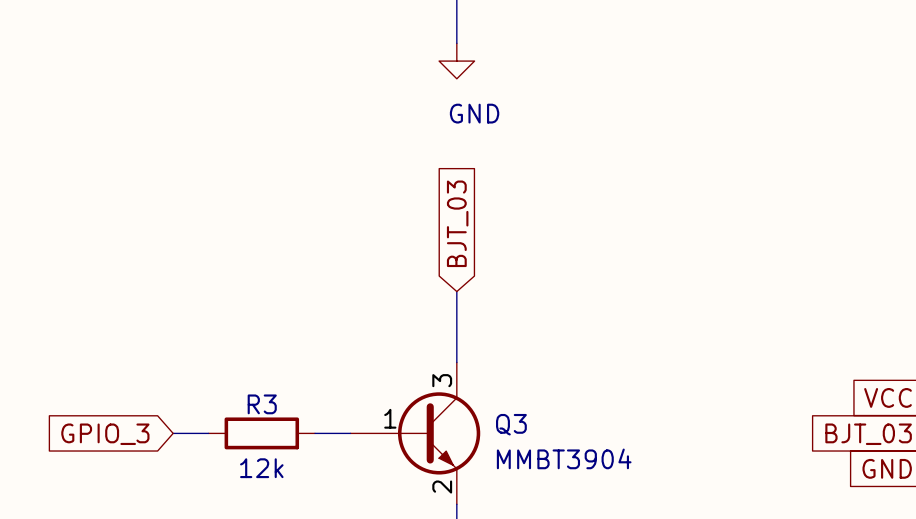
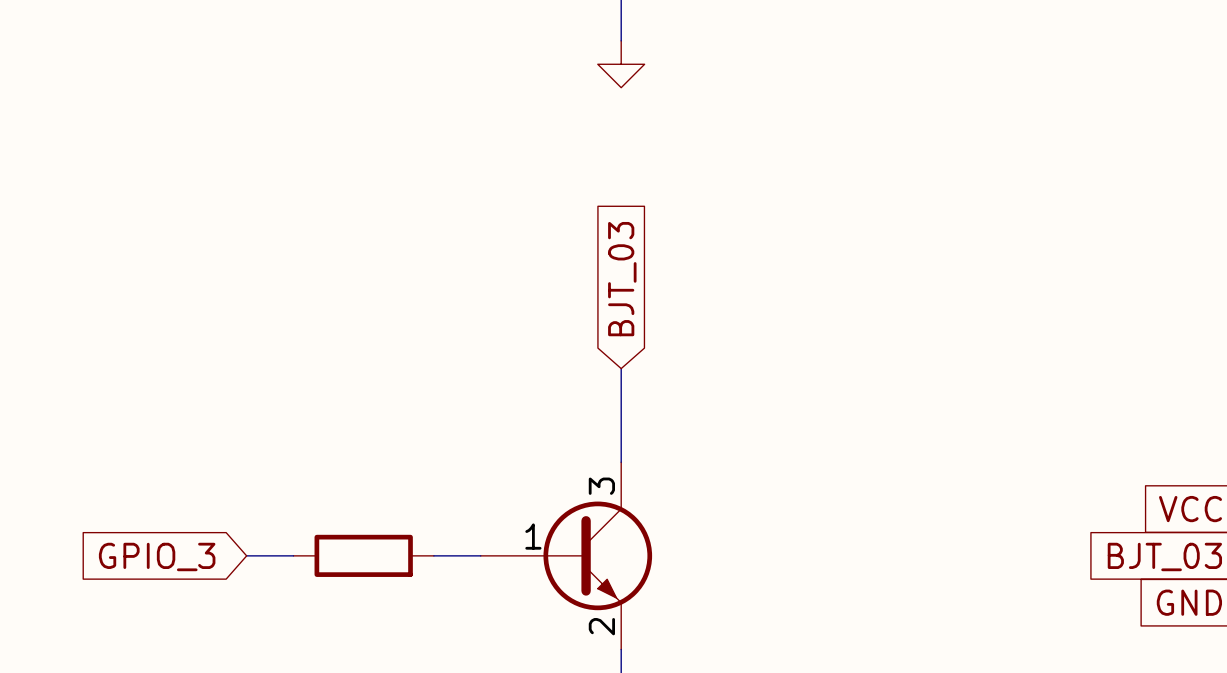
power symbol text: GND (474, 113) -> none
R3 name: R3 (262, 404) -> none
Q3 name: Q3 (511, 424) -> none
Q3 value: MMBT3904 (564, 458) -> none
R3 value: 12k (261, 468) -> none

